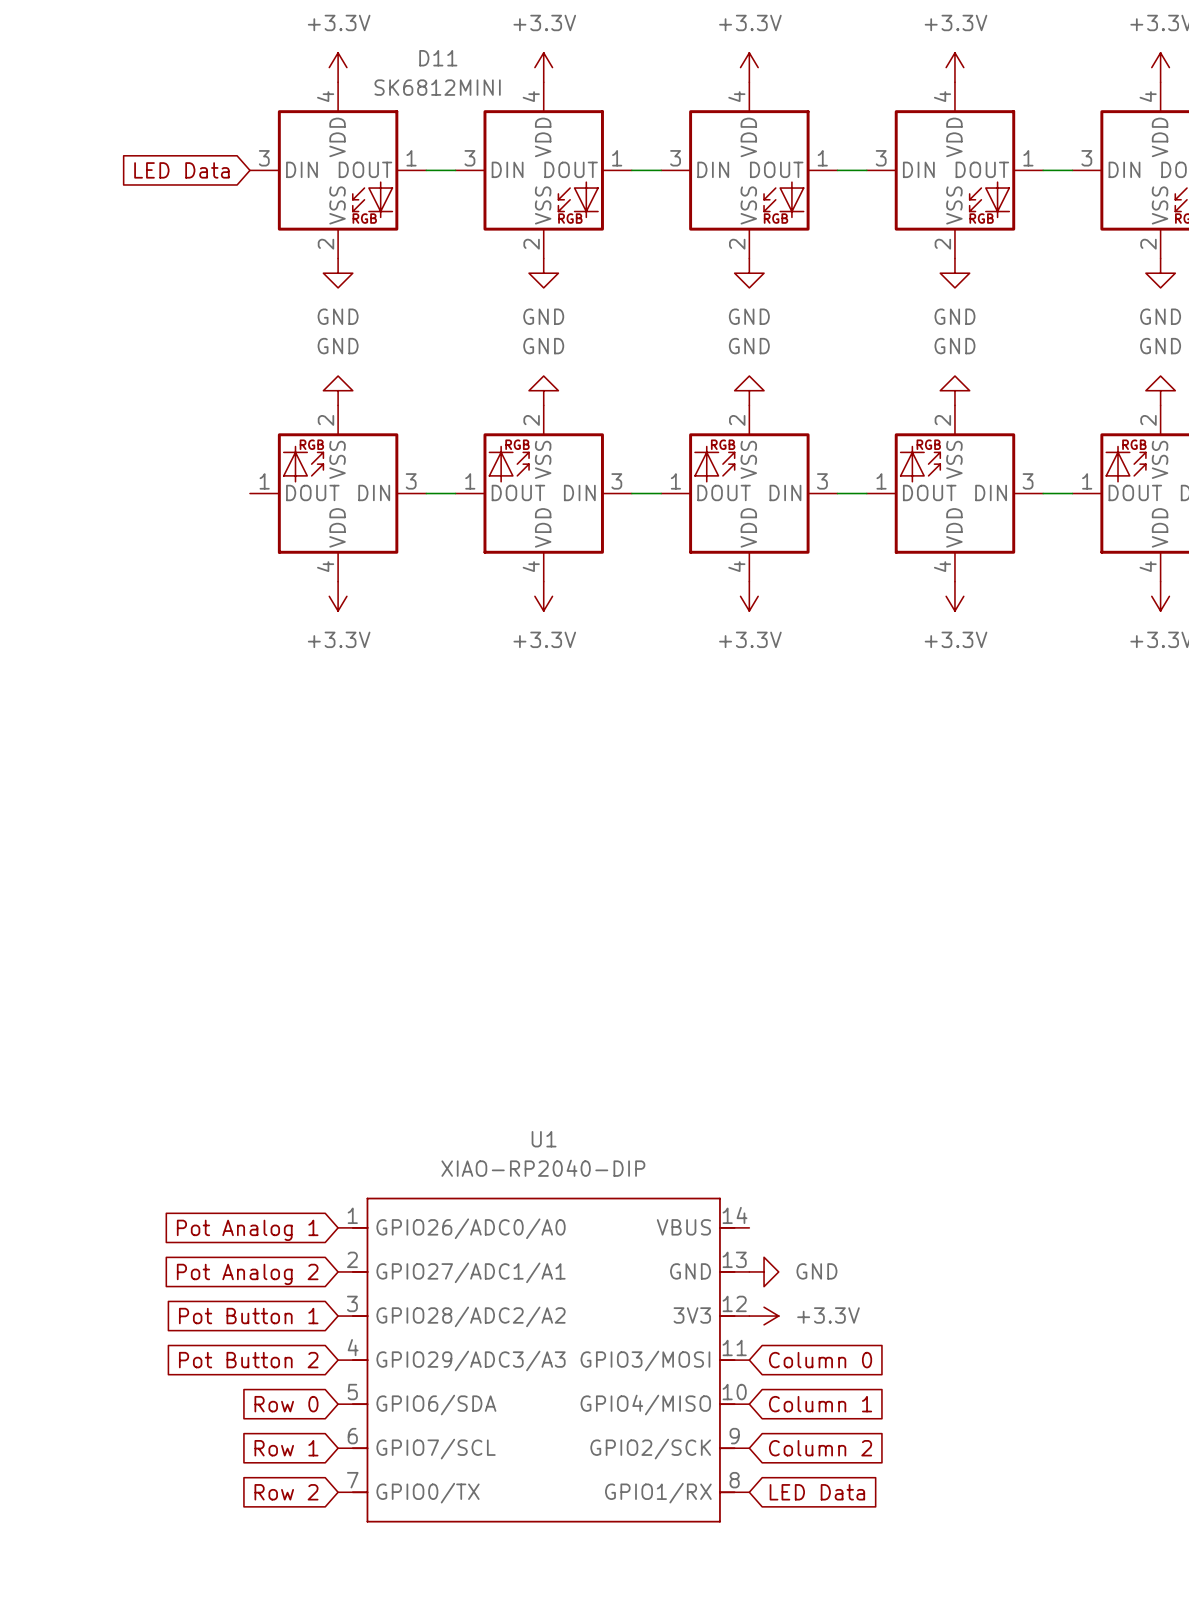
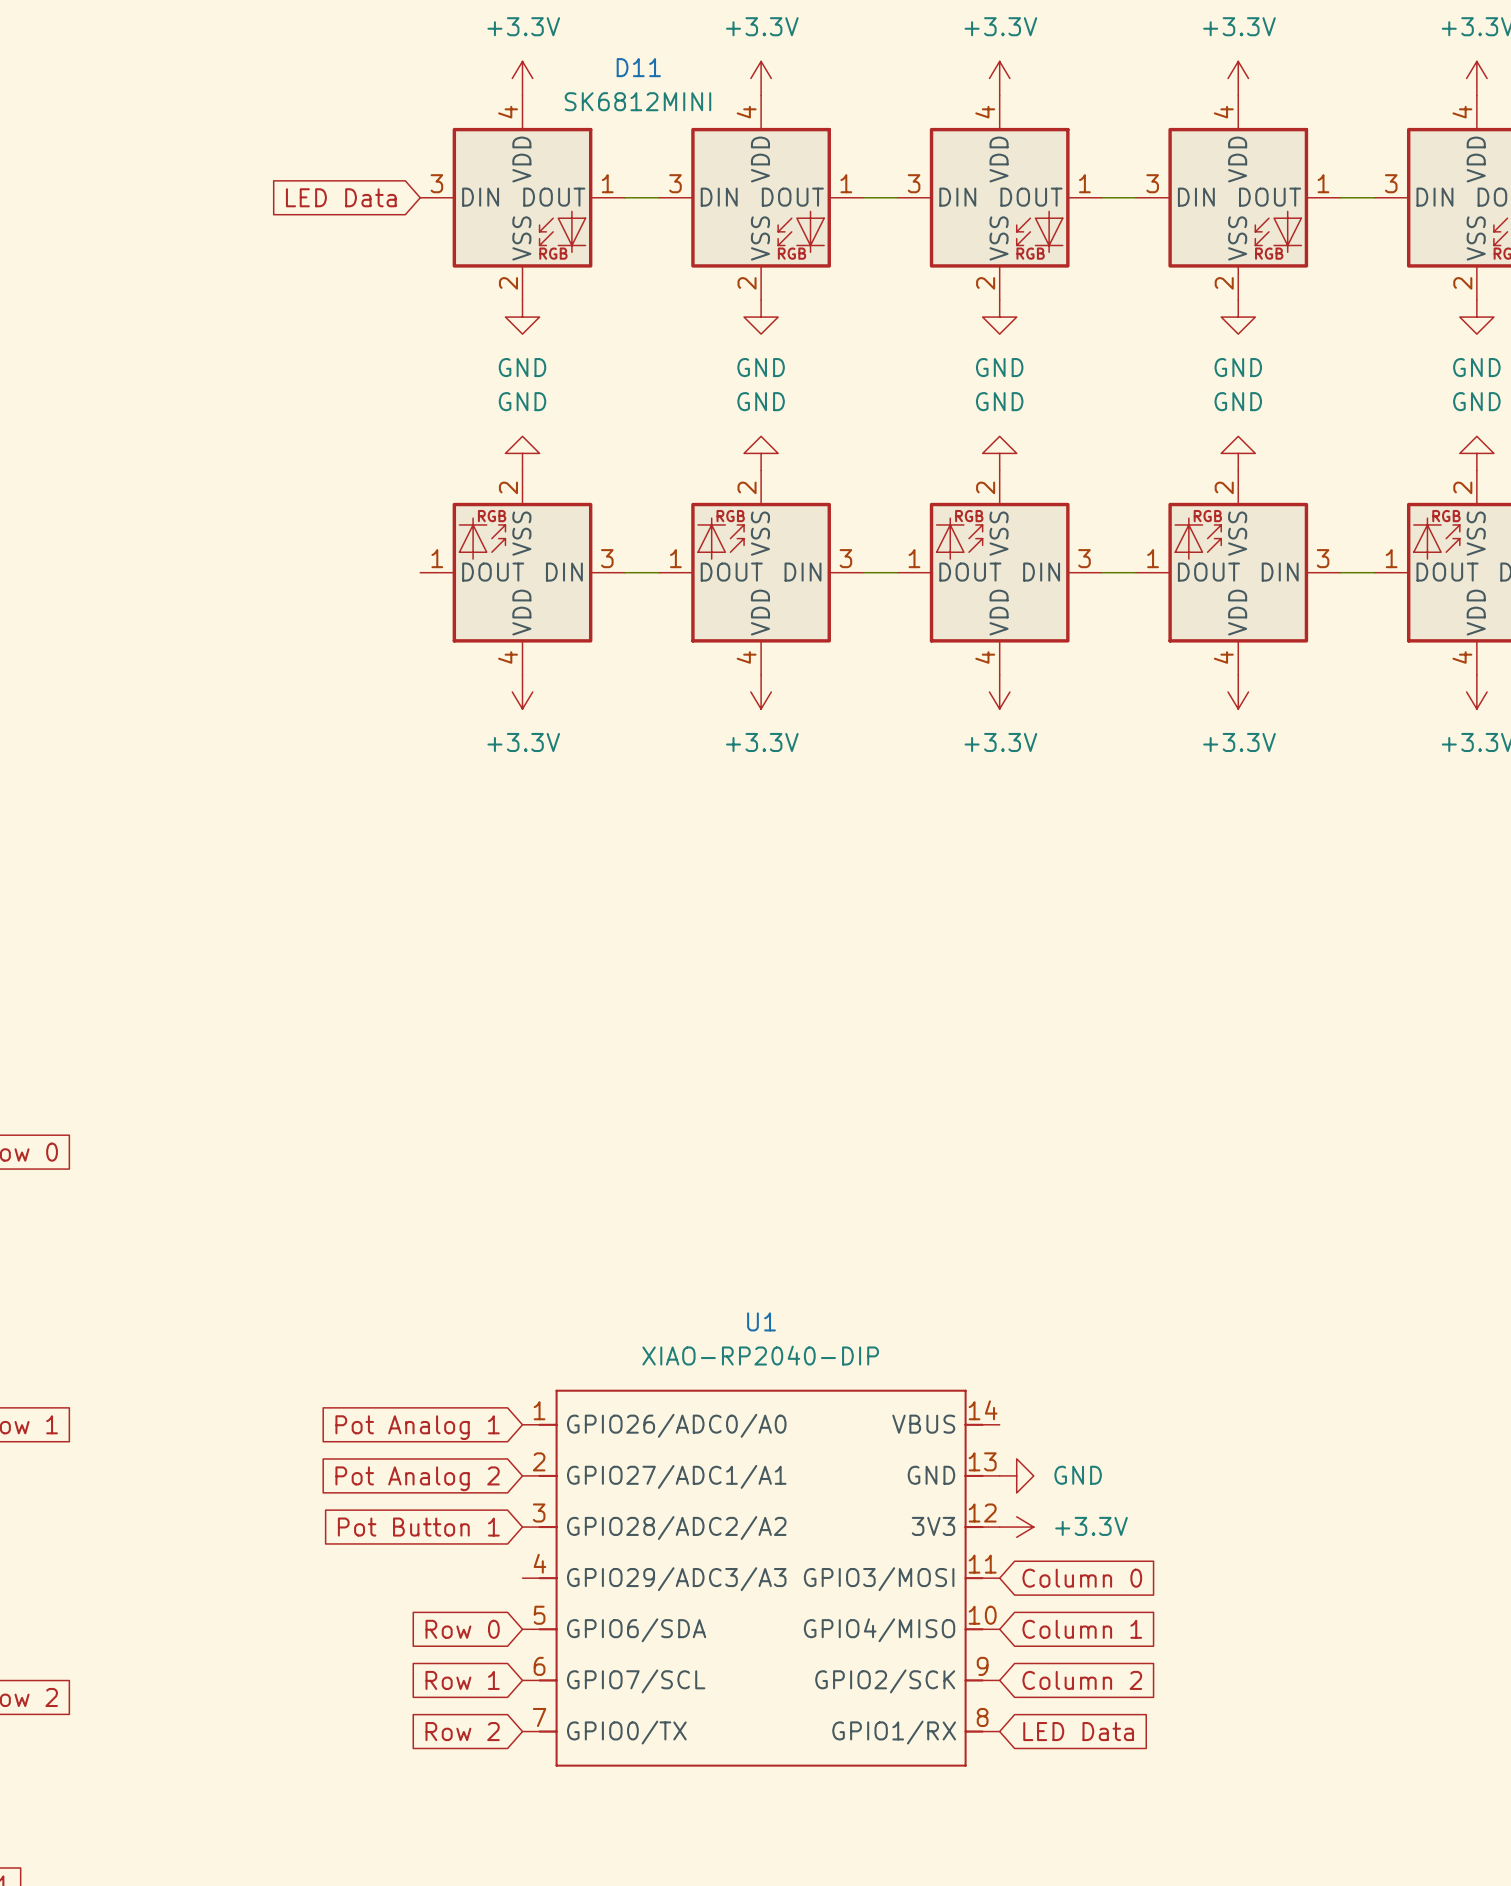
global label: Pot Button 2 (248, 1360) -> none

